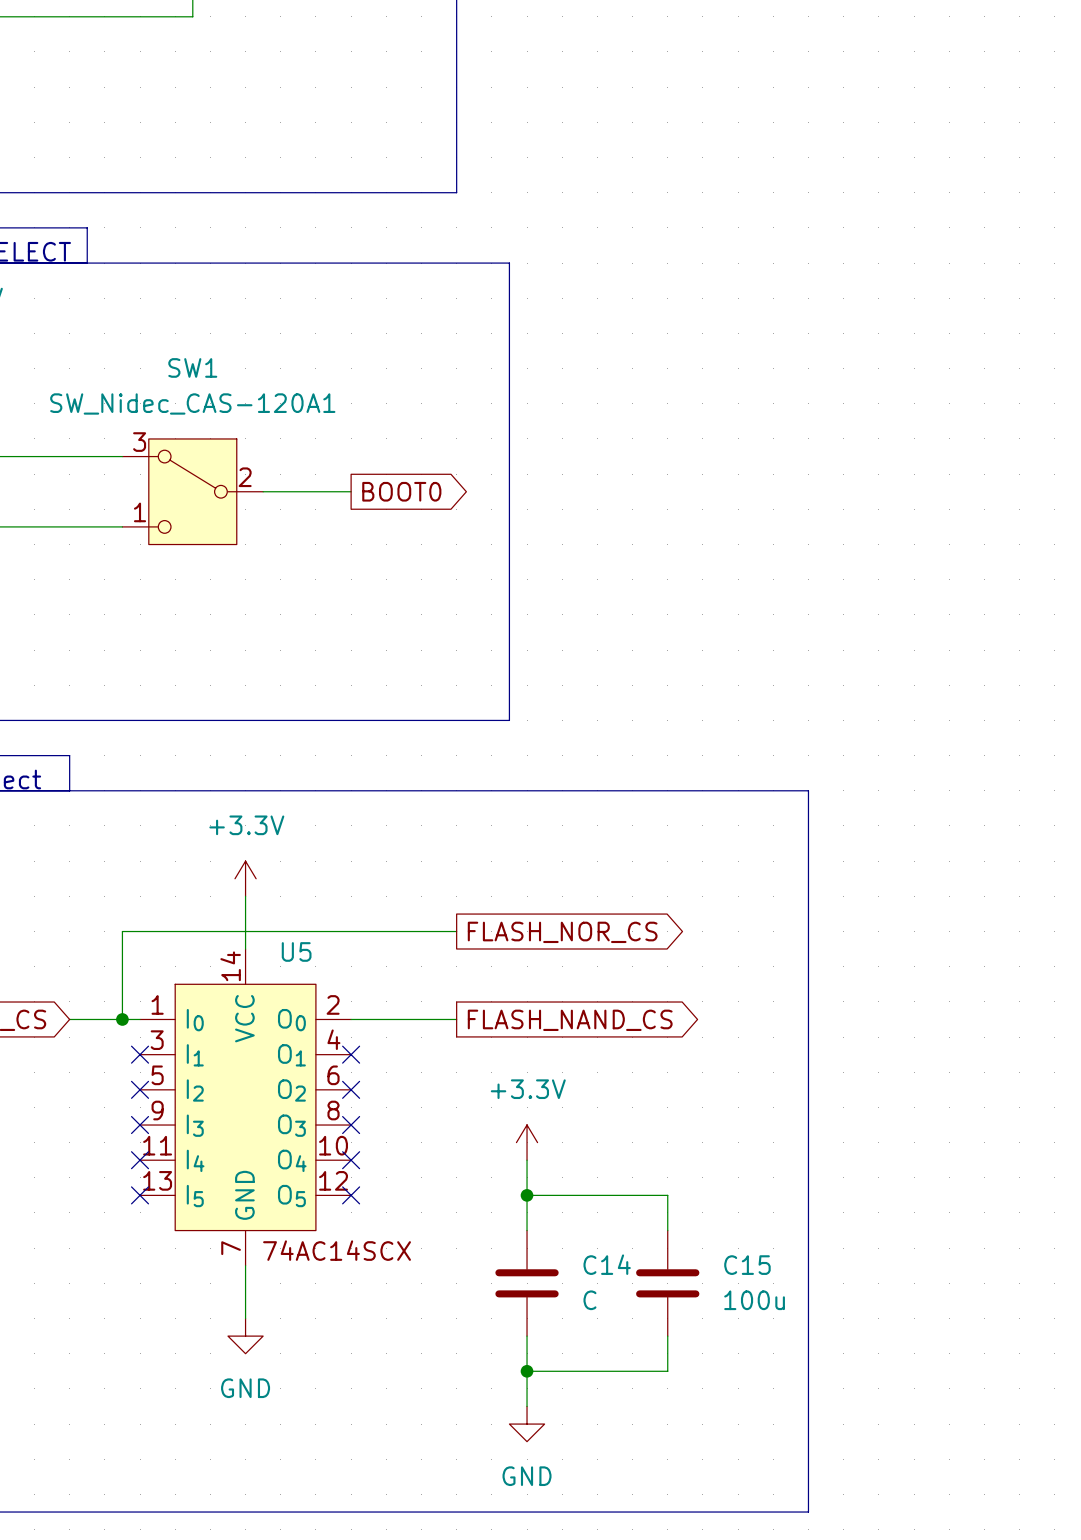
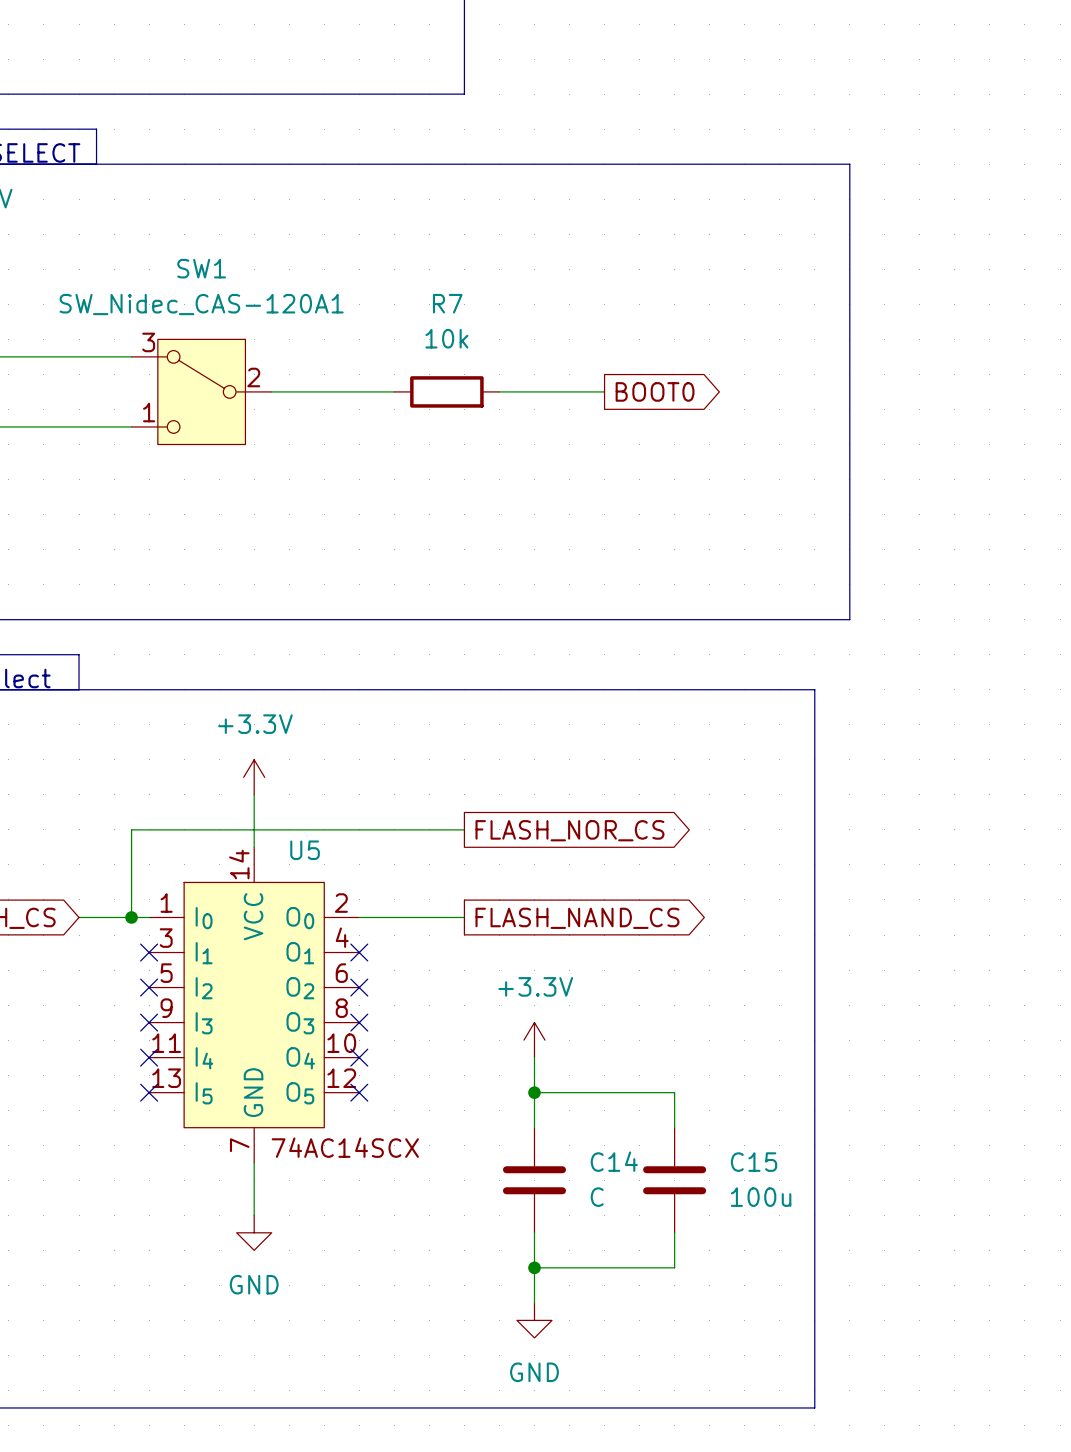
line: (509, 263) (509, 720) -> (516, 164) (849, 164) (849, 619) (516, 619)
wire: none -> (359, 391) (394, 391)
global label position: BOOT0 (401, 491) -> BOOT0 (655, 391)
R7: none -> 10k (446, 391)
wire: none -> (499, 391) (604, 391)

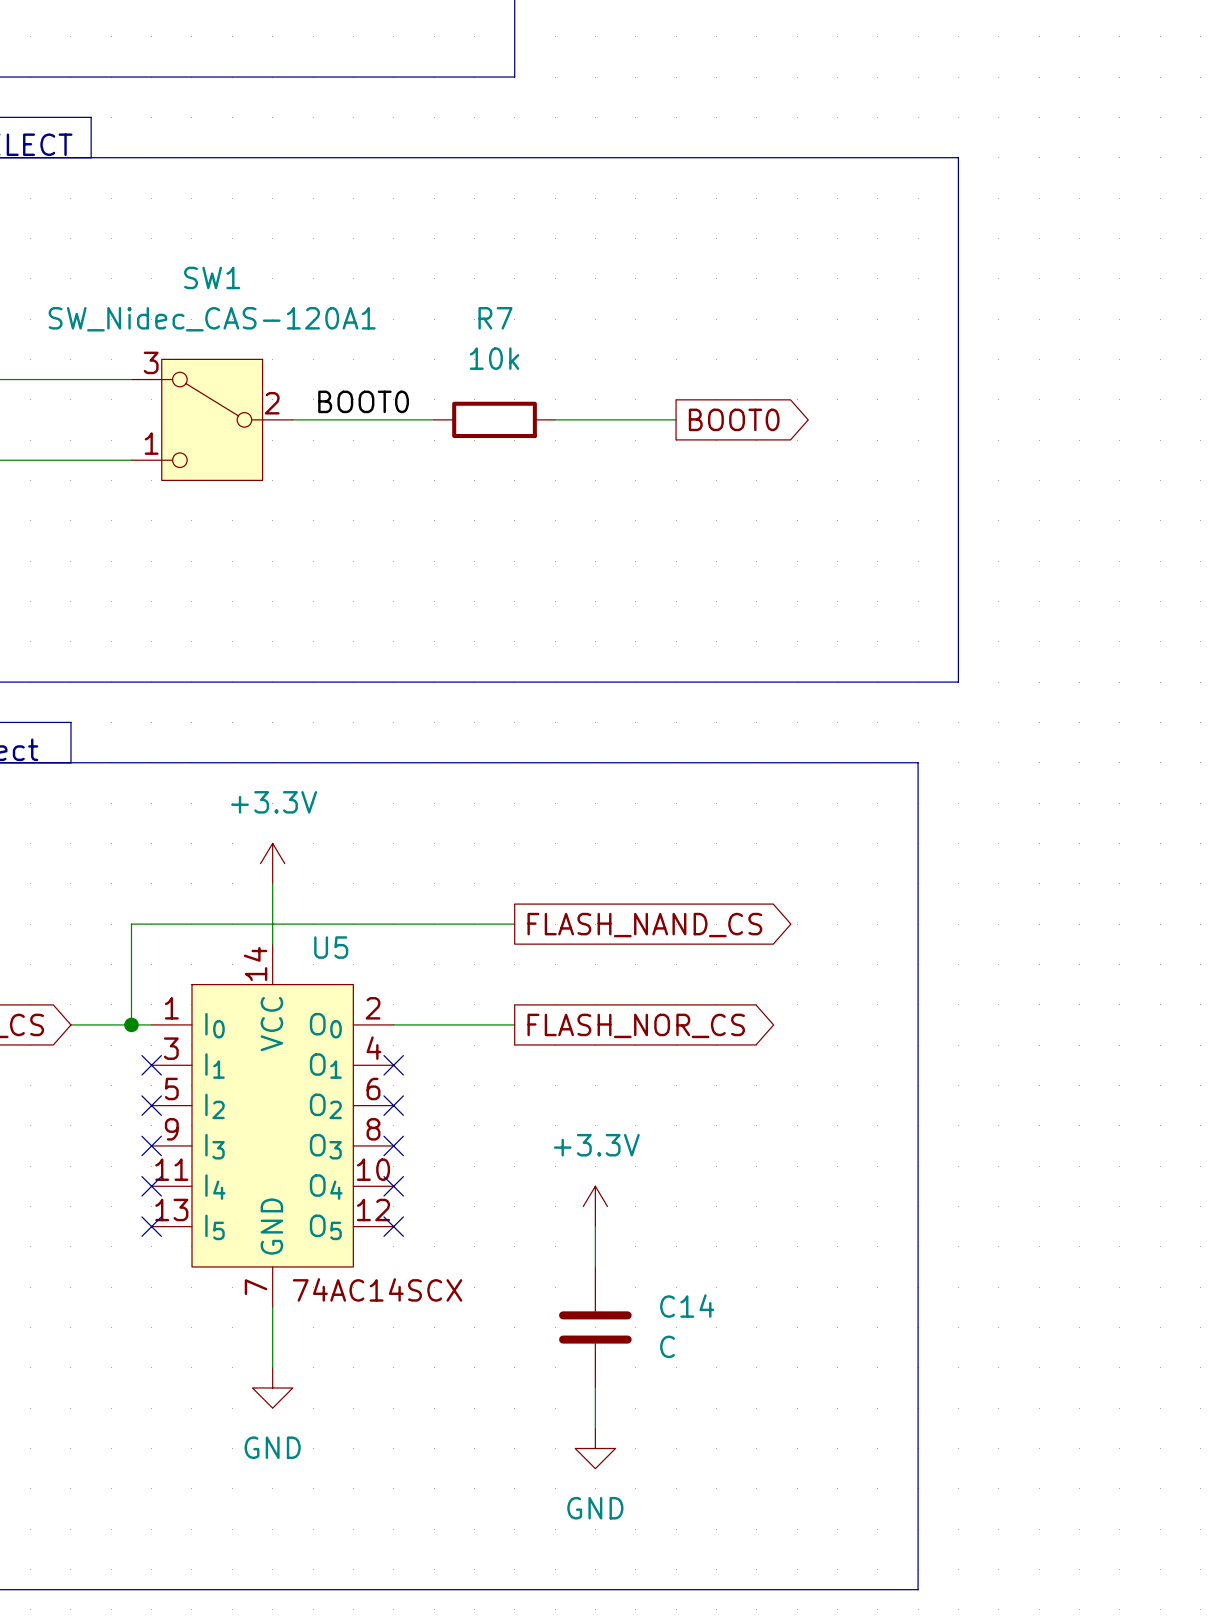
label: none -> BOOT0 (363, 401)
global label: FLASH_NOR_CS (569, 830) -> FLASH_NAND_CS (644, 925)
global label: FLASH_NAND_CS (577, 918) -> FLASH_NOR_CS (636, 1025)
power symbol position: +3.3V (534, 1040) -> +3.3V (595, 1206)
wire: (534, 1057) (534, 1092) (674, 1092) (674, 1127) -> none
junction: (534, 1092) -> none
C15: 100u (674, 1180) -> none
wire: (674, 1232) (674, 1267) (534, 1267) (534, 1302) -> none
junction: (534, 1267) -> none
power symbol position: GND (534, 1320) -> GND (595, 1448)

